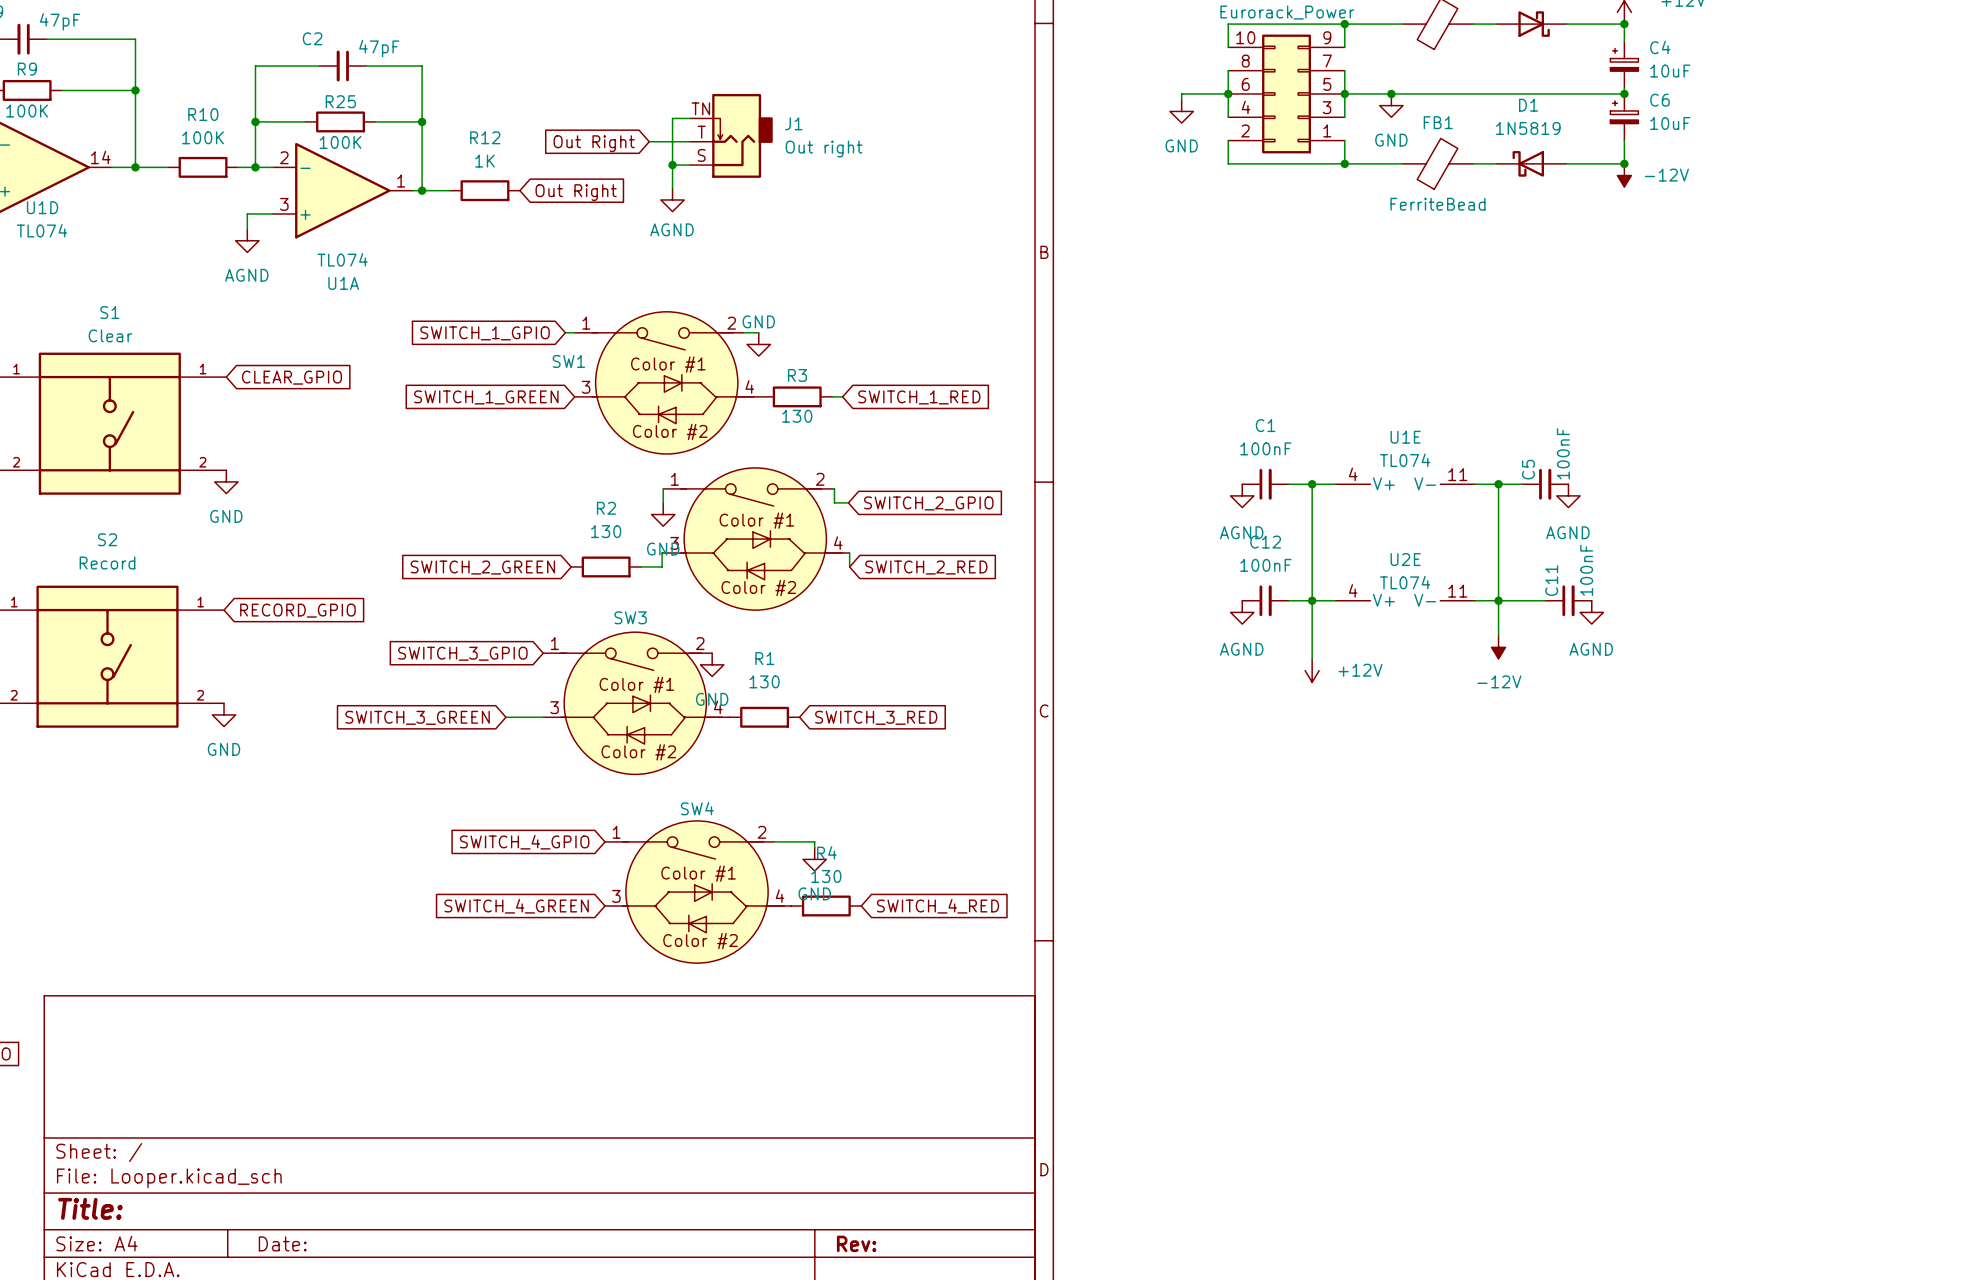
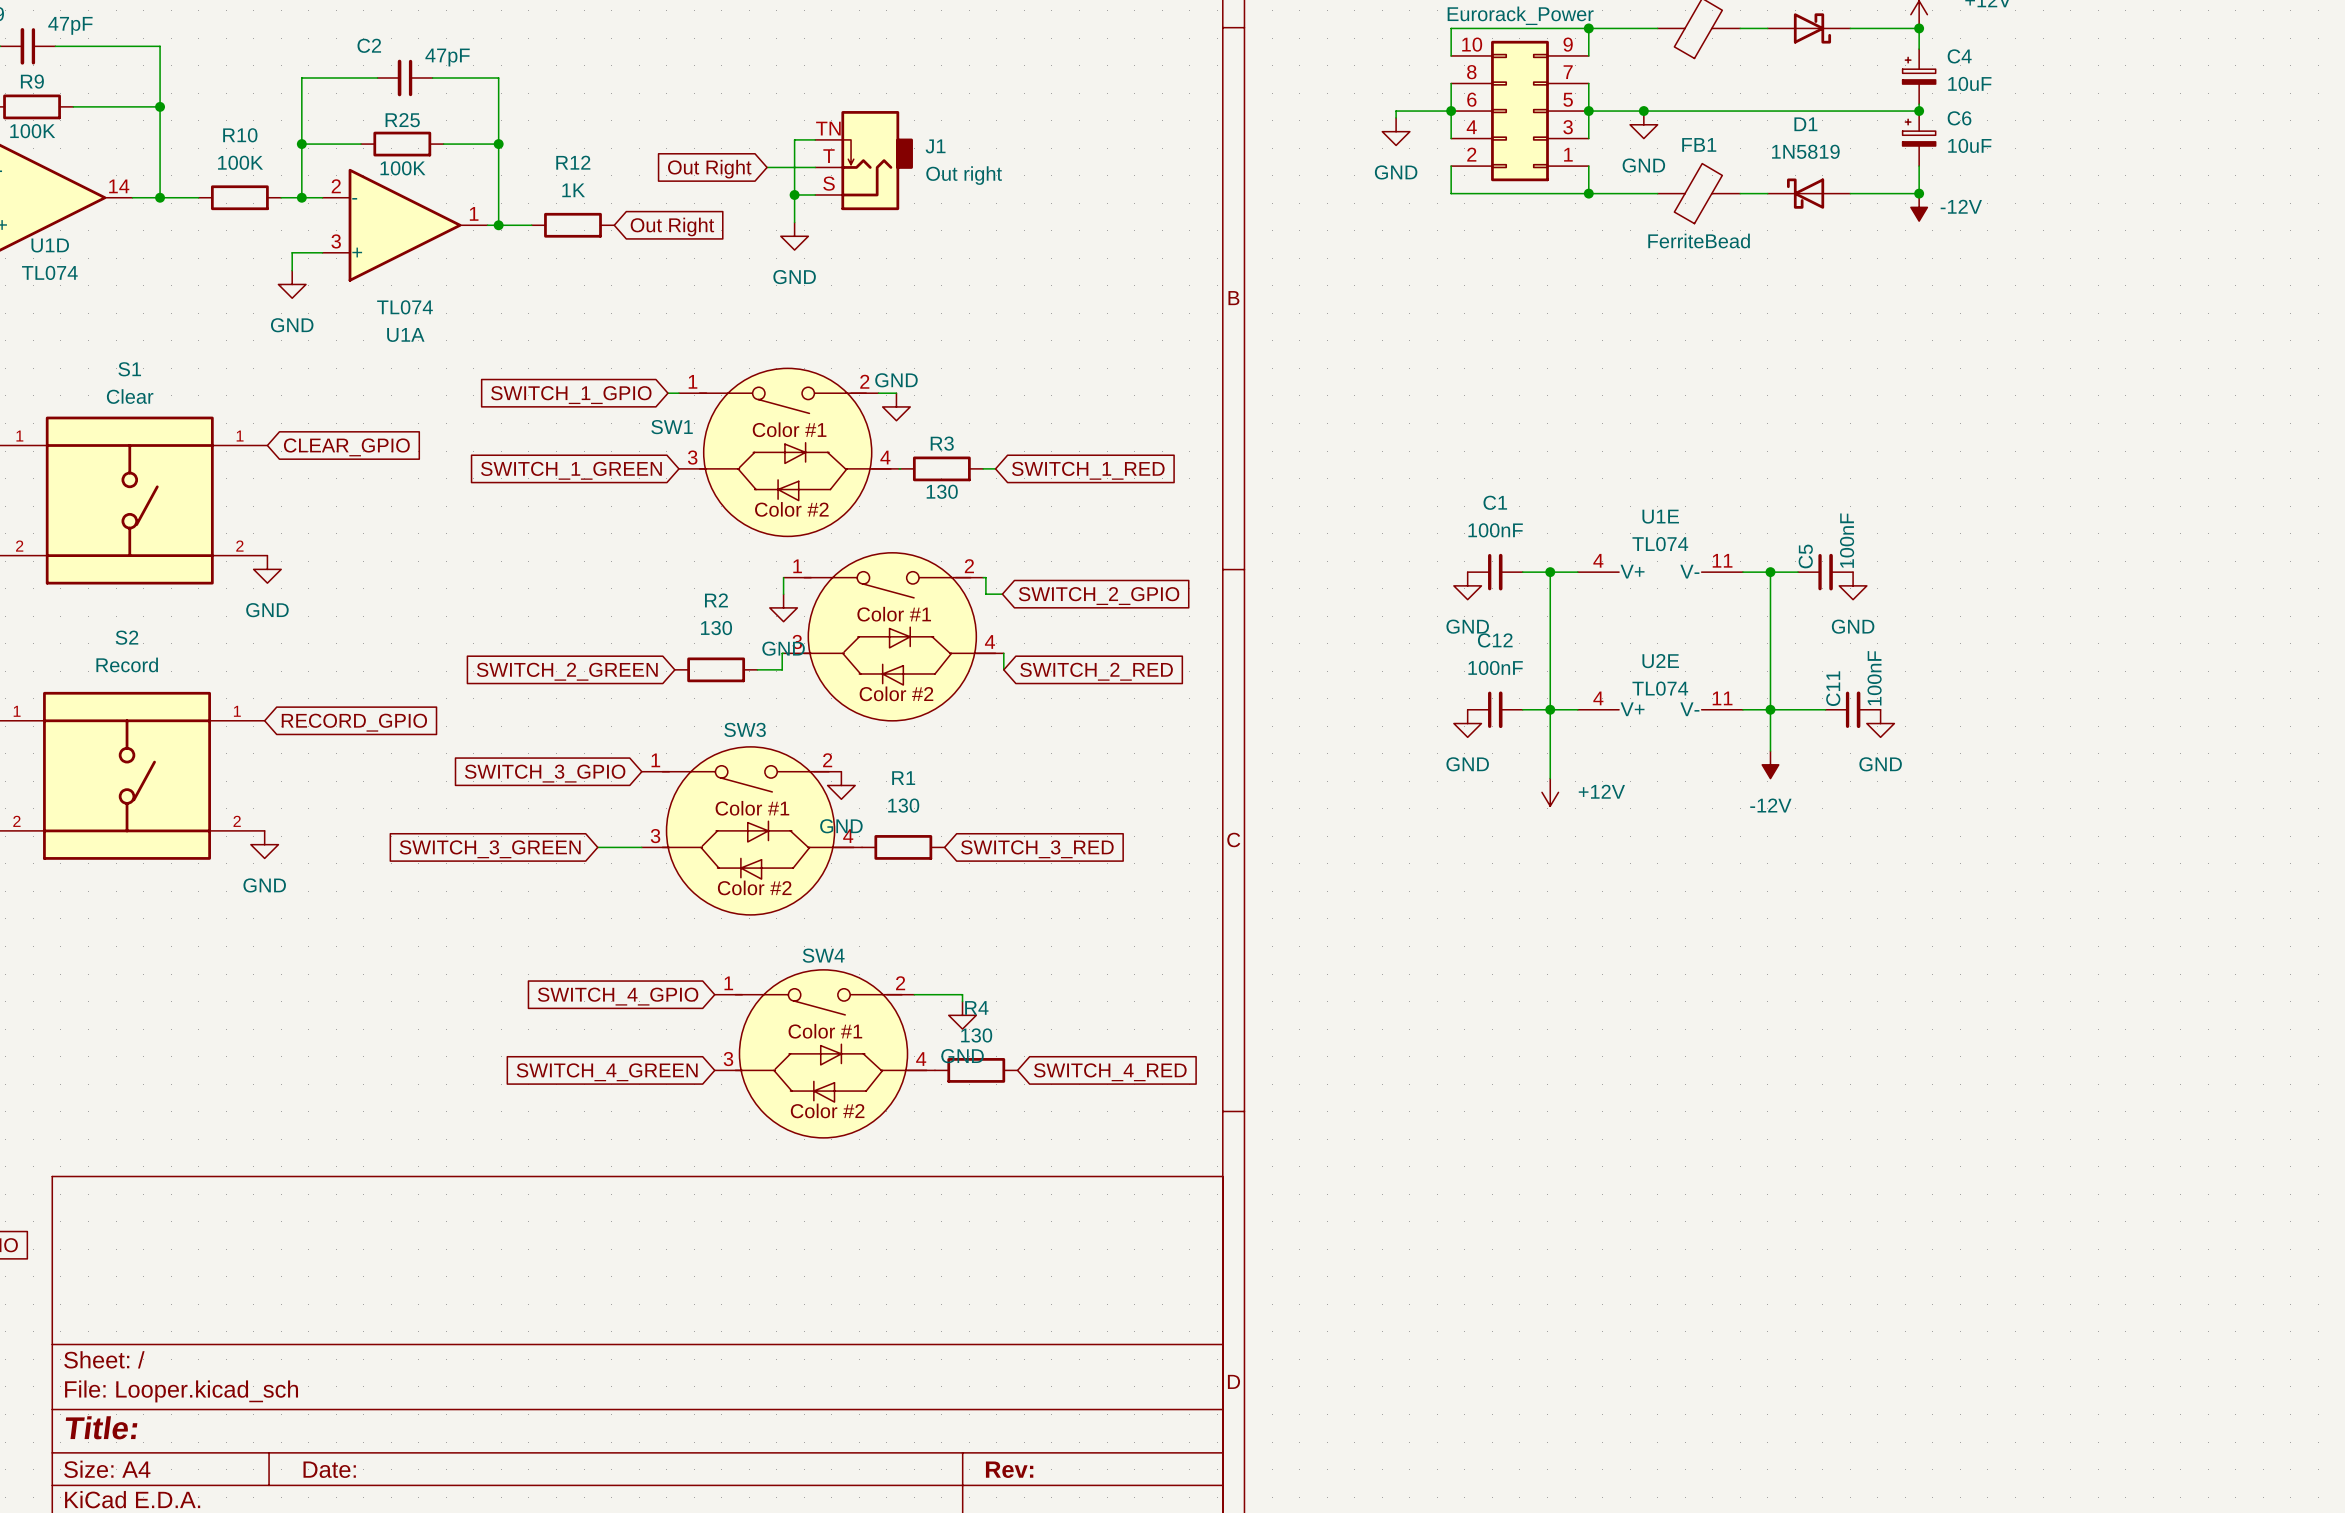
power symbol: AGND (672, 199) -> GND (794, 236)
power symbol: AGND (247, 240) -> GND (292, 284)
power symbol: AGND (1242, 495) -> GND (1467, 585)
power symbol: AGND (1568, 495) -> GND (1853, 585)
power symbol: AGND (1242, 612) -> GND (1467, 723)
power symbol: AGND (1591, 612) -> GND (1880, 723)

